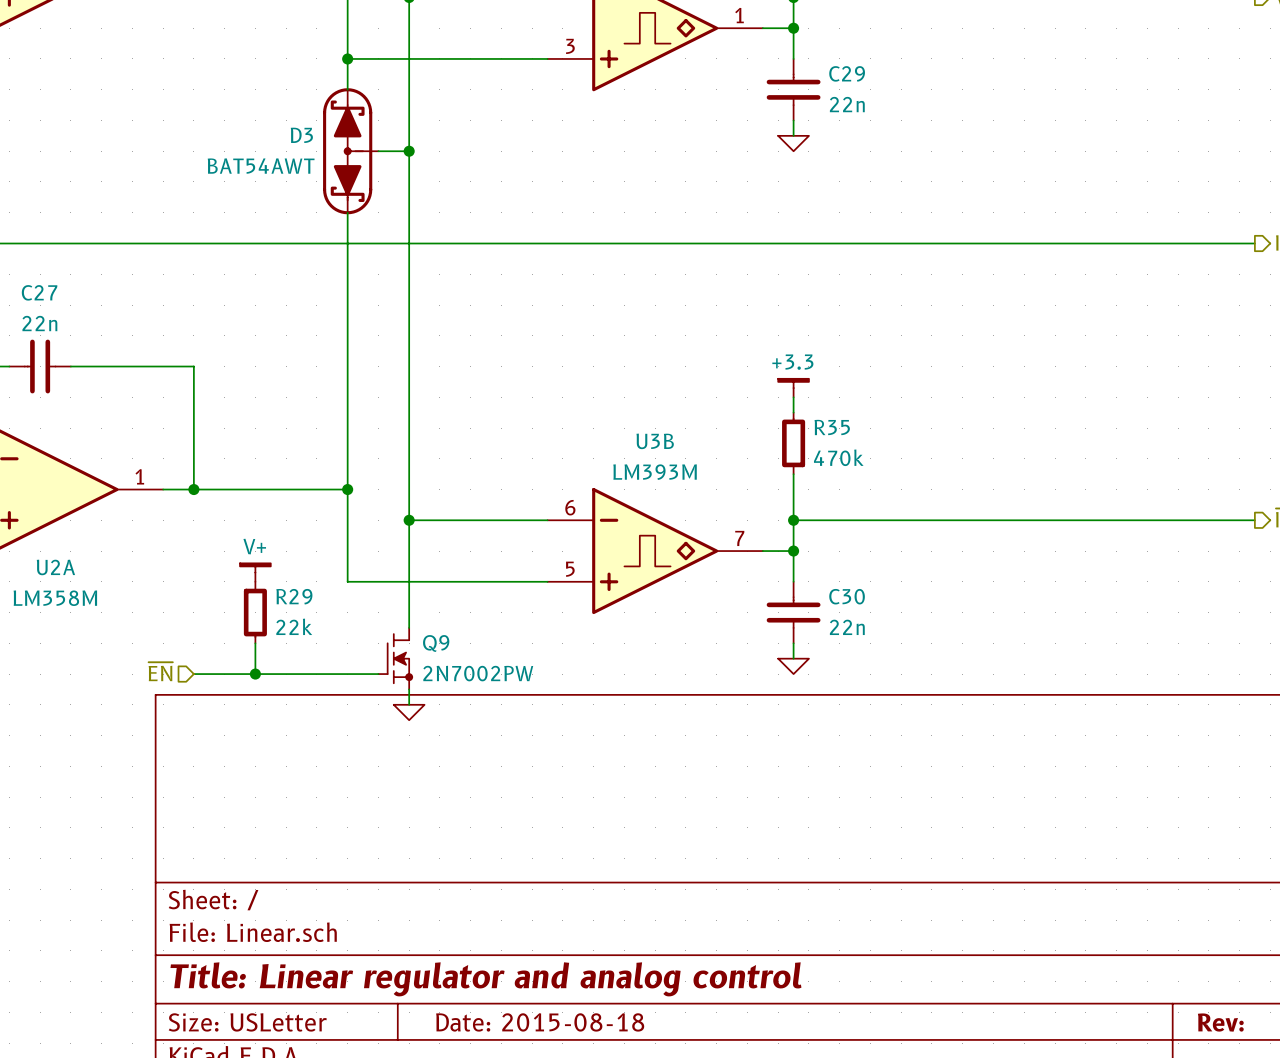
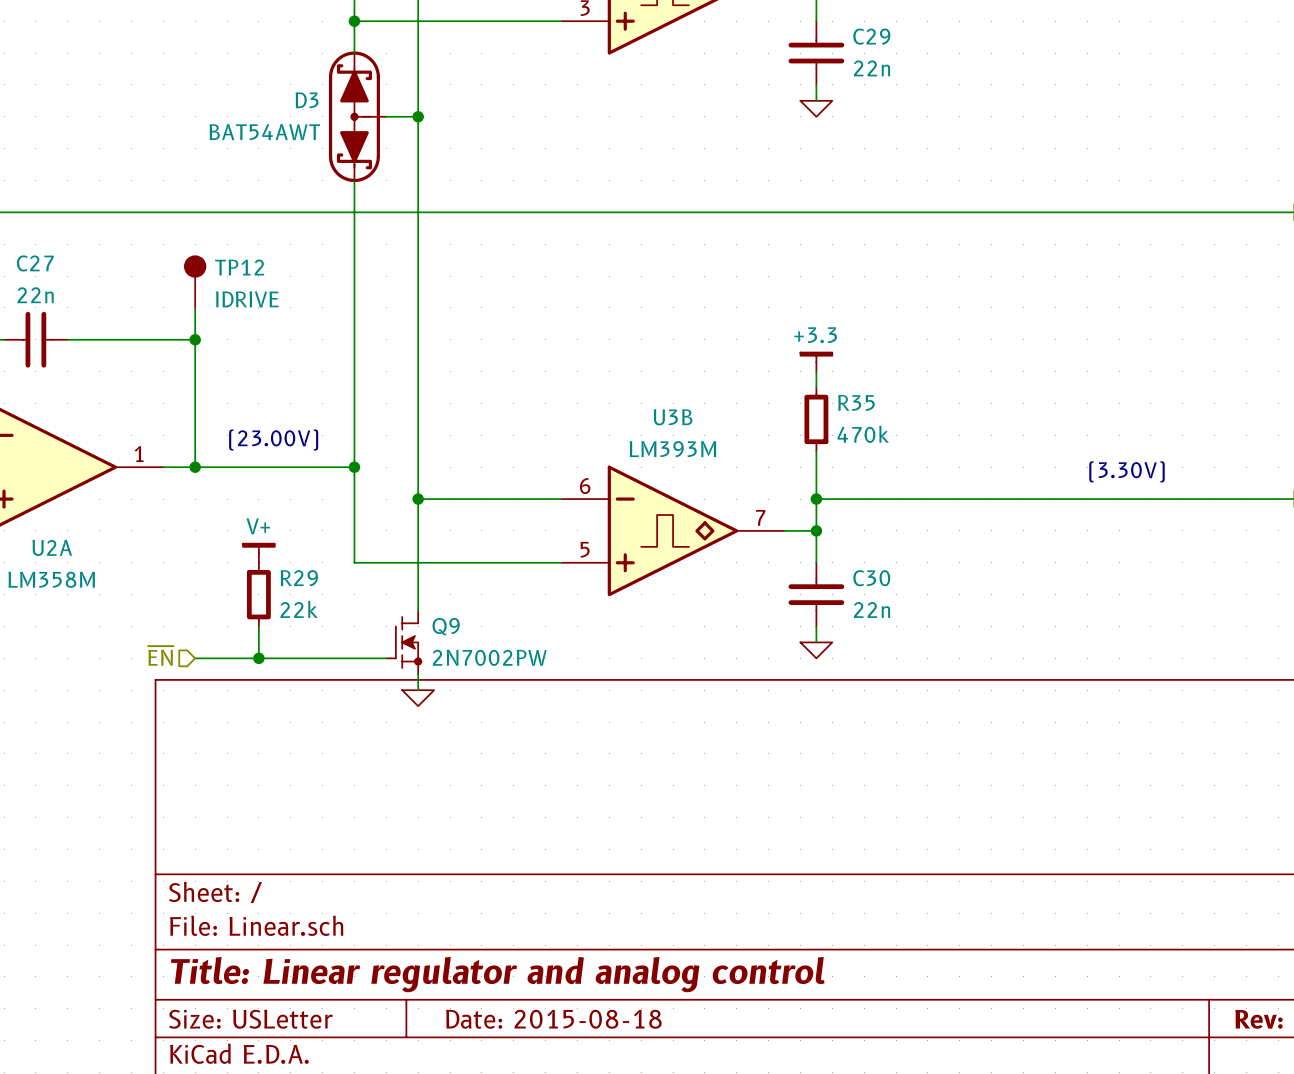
TP12: none -> IDRIVE (195, 281)
wire: none -> (195, 307) (195, 339)
junction: none -> (195, 339)
text: none -> (23.00V) (273, 440)
text: none -> (3.30V) (1127, 471)

